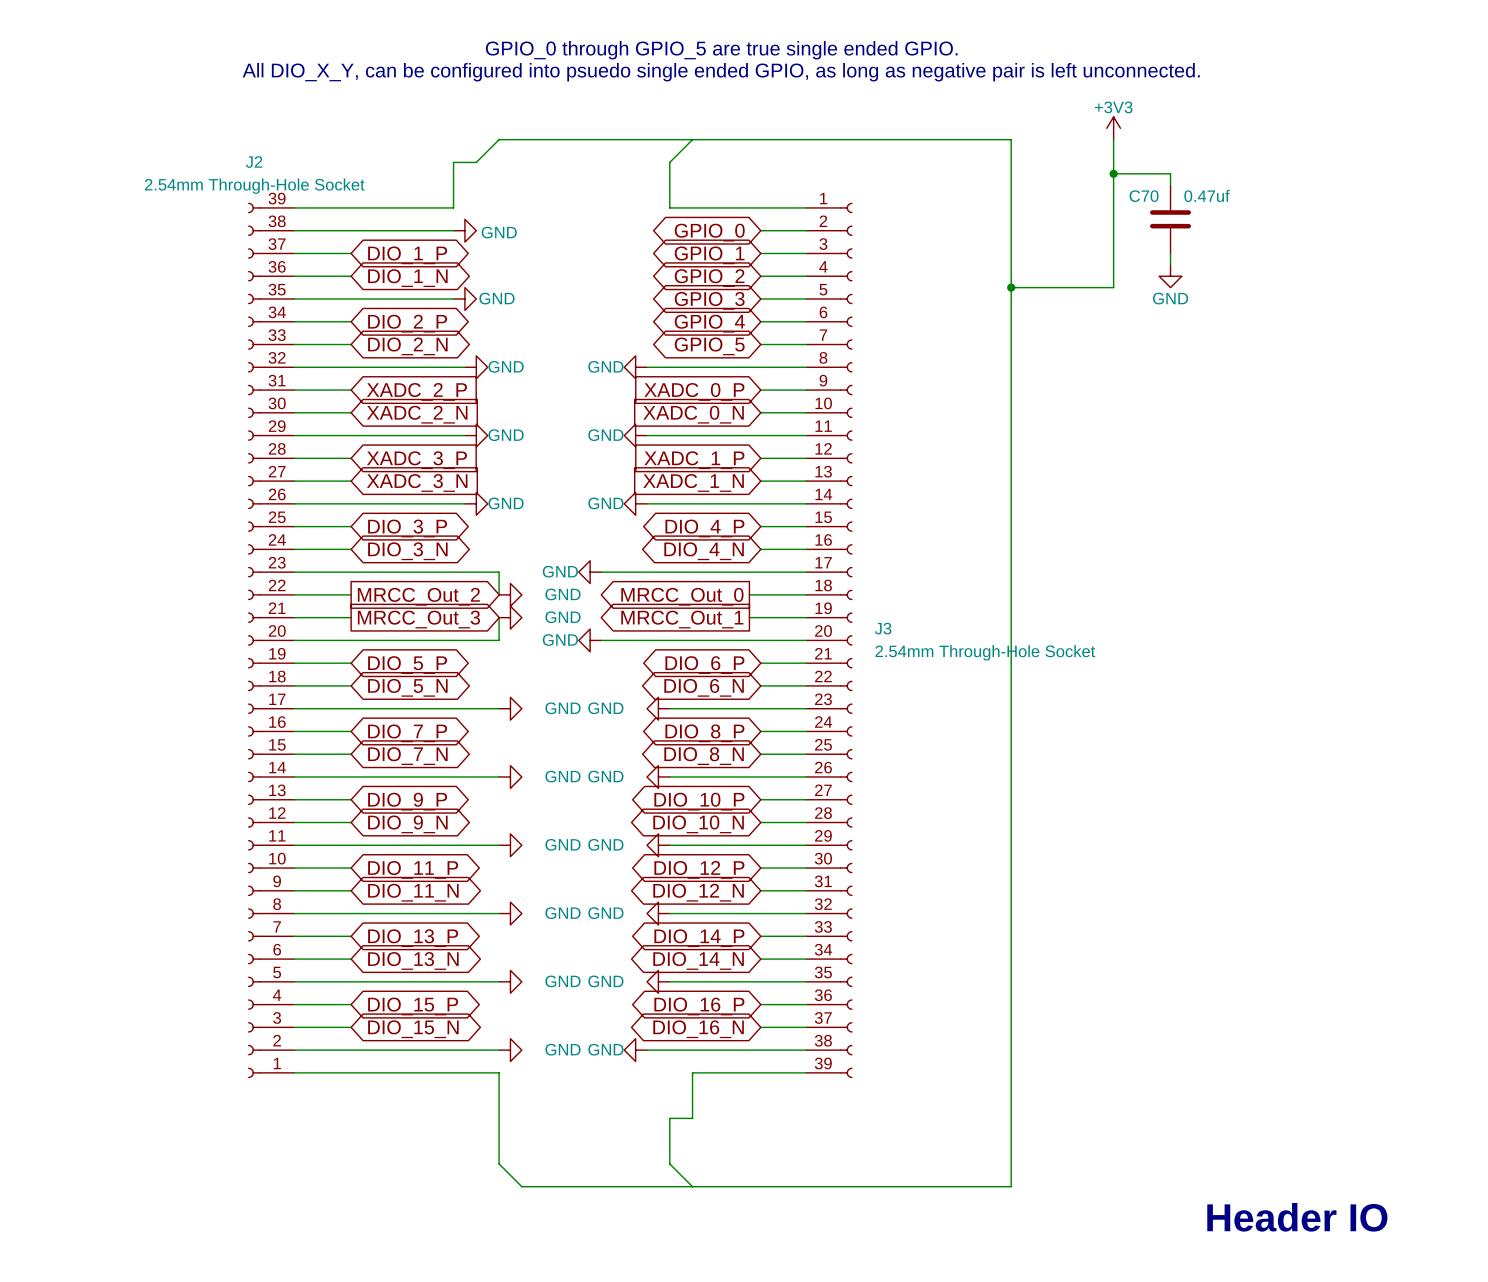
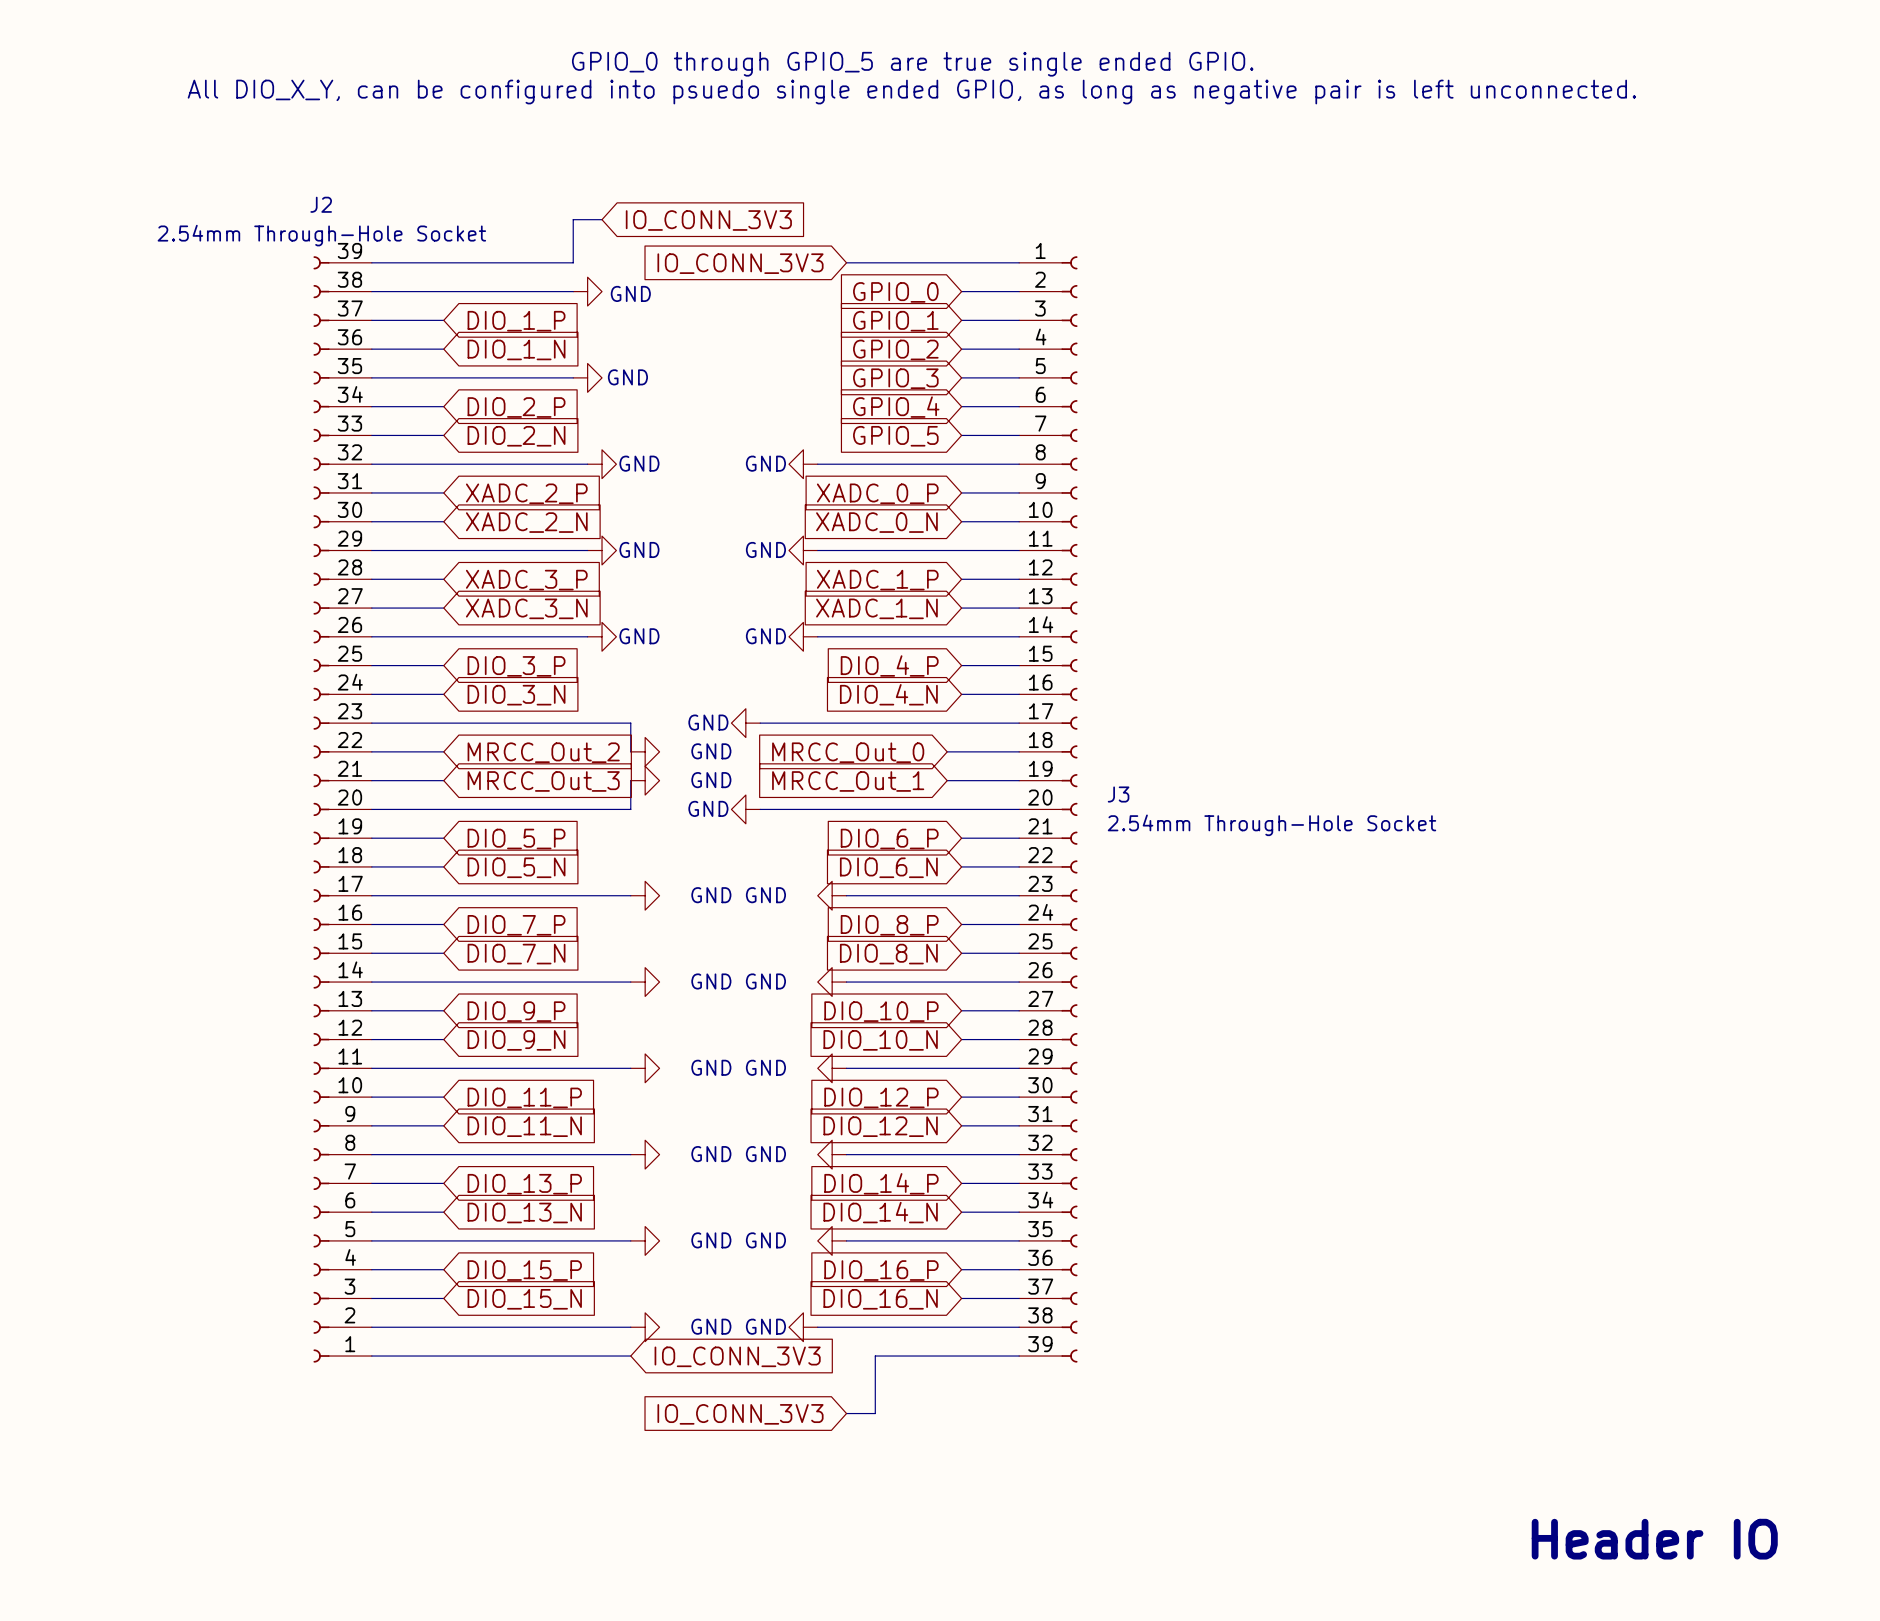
power symbol: +3V3 (1113, 128) -> none
wire: (692, 139) (669, 162) (669, 207) -> none
wire: (1113, 139) (1113, 287) (1011, 287) -> none
wire: (453, 173) (453, 162) (476, 162) (499, 139) (1011, 139) (1011, 1186) (521, 1186) (499, 1163) (499, 1072) -> (573, 219) (602, 219)
wire: (1113, 173) (1170, 173) (1170, 185) -> none
junction: (1113, 173) -> none
global label: none -> IO_CONN_3V3 (708, 220)
global label: none -> IO_CONN_3V3 (740, 263)
C70: 0.47uf (1170, 219) -> none
global label shape: bidirectional (709, 232) -> input (895, 292)
wire: (1170, 253) (1170, 264) -> none
global label shape: bidirectional (407, 255) -> input (516, 321)
global label shape: bidirectional (709, 255) -> input (895, 321)
power symbol: GND (1170, 276) -> none
global label shape: bidirectional (407, 278) -> input (516, 349)
global label shape: bidirectional (709, 278) -> input (895, 349)
junction: (1011, 287) -> none
global label shape: bidirectional (709, 300) -> input (895, 378)
global label shape: bidirectional (407, 323) -> input (516, 407)
global label shape: bidirectional (709, 323) -> input (896, 407)
global label shape: bidirectional (407, 346) -> input (516, 436)
global label shape: bidirectional (709, 346) -> input (895, 436)
global label shape: bidirectional (407, 528) -> input (516, 666)
global label shape: bidirectional (704, 528) -> input (889, 665)
global label shape: bidirectional (407, 551) -> input (516, 695)
global label shape: bidirectional (704, 551) -> input (888, 694)
global label shape: output (418, 596) -> input (543, 752)
global label shape: output (682, 596) -> input (848, 752)
global label shape: output (418, 619) -> input (543, 781)
global label shape: output (682, 619) -> input (848, 781)
global label shape: bidirectional (407, 665) -> input (516, 839)
global label shape: bidirectional (704, 665) -> input (889, 839)
global label shape: bidirectional (407, 687) -> input (516, 867)
global label shape: bidirectional (704, 687) -> input (888, 867)
global label shape: bidirectional (407, 733) -> input (516, 925)
global label shape: bidirectional (704, 733) -> input (889, 925)
global label shape: bidirectional (407, 756) -> input (516, 954)
global label shape: bidirectional (704, 756) -> input (888, 954)
global label shape: bidirectional (407, 801) -> input (516, 1011)
global label shape: bidirectional (699, 801) -> input (881, 1011)
global label shape: bidirectional (407, 824) -> input (516, 1040)
global label shape: bidirectional (698, 824) -> input (880, 1040)
global label shape: bidirectional (413, 869) -> input (524, 1097)
global label shape: bidirectional (699, 869) -> input (881, 1097)
global label shape: bidirectional (413, 892) -> input (524, 1126)
global label shape: bidirectional (698, 892) -> input (880, 1126)
global label shape: bidirectional (413, 938) -> input (524, 1184)
global label shape: bidirectional (699, 938) -> input (881, 1183)
global label shape: bidirectional (413, 960) -> input (524, 1212)
global label shape: bidirectional (698, 960) -> input (880, 1212)
global label shape: bidirectional (413, 1006) -> input (524, 1270)
global label shape: bidirectional (699, 1006) -> input (881, 1270)
global label shape: bidirectional (413, 1029) -> input (524, 1299)
global label shape: bidirectional (698, 1029) -> input (880, 1299)
global label: none -> IO_CONN_3V3 (737, 1356)
wire: (669, 1118) (669, 1163) (692, 1186) -> none
global label: none -> IO_CONN_3V3 (740, 1414)

